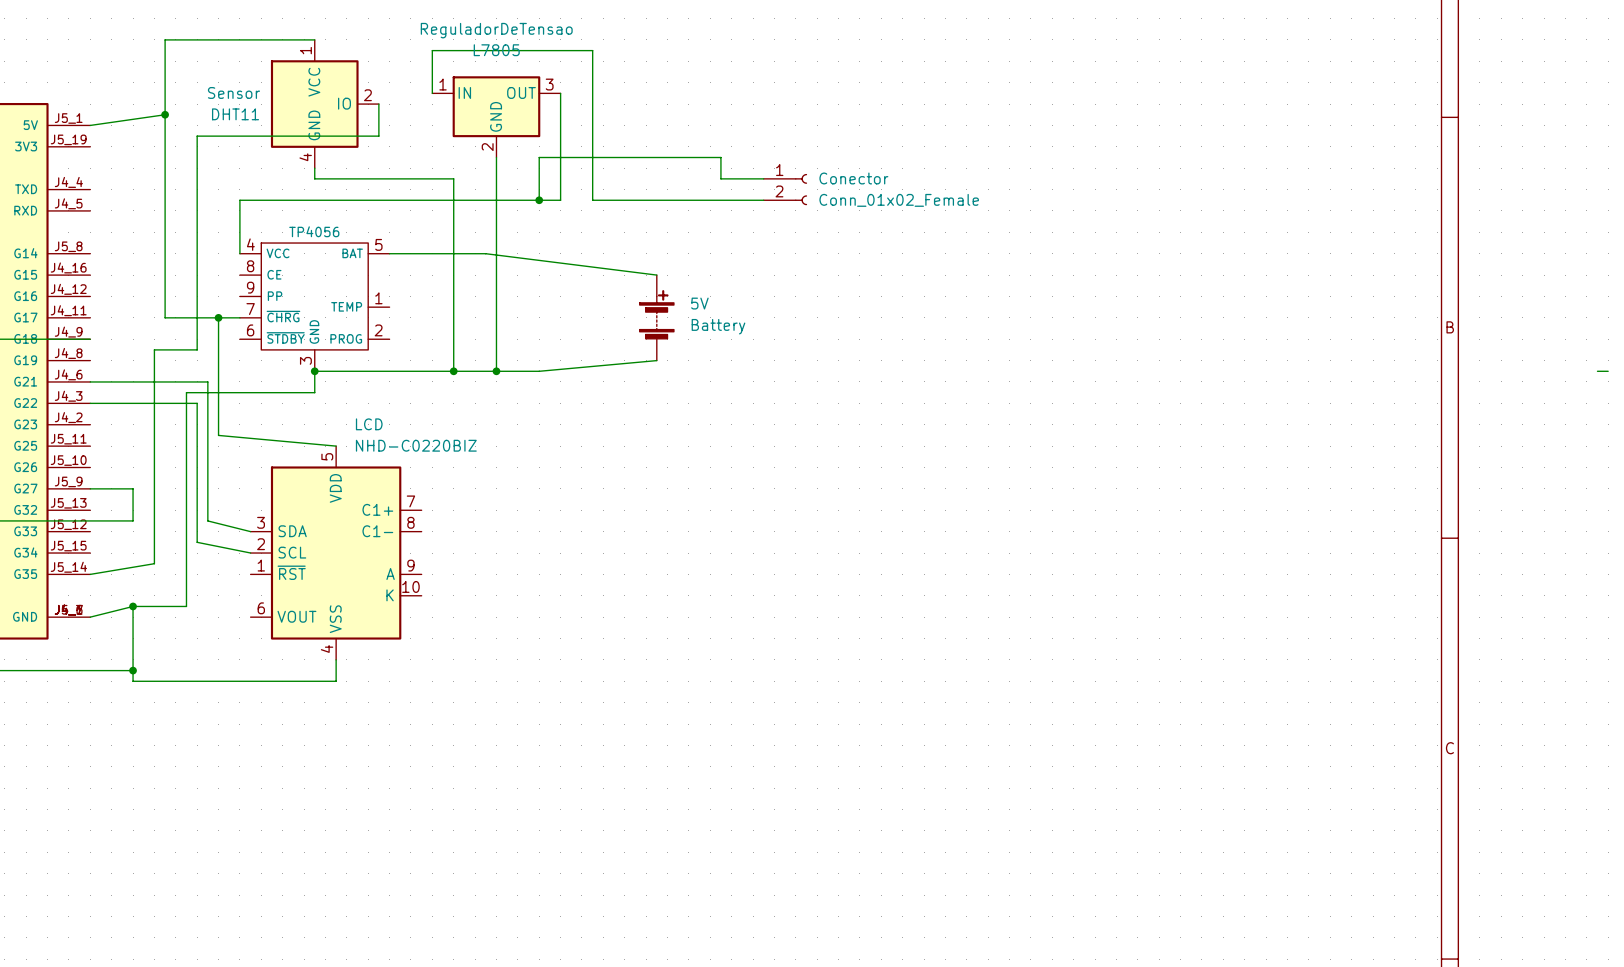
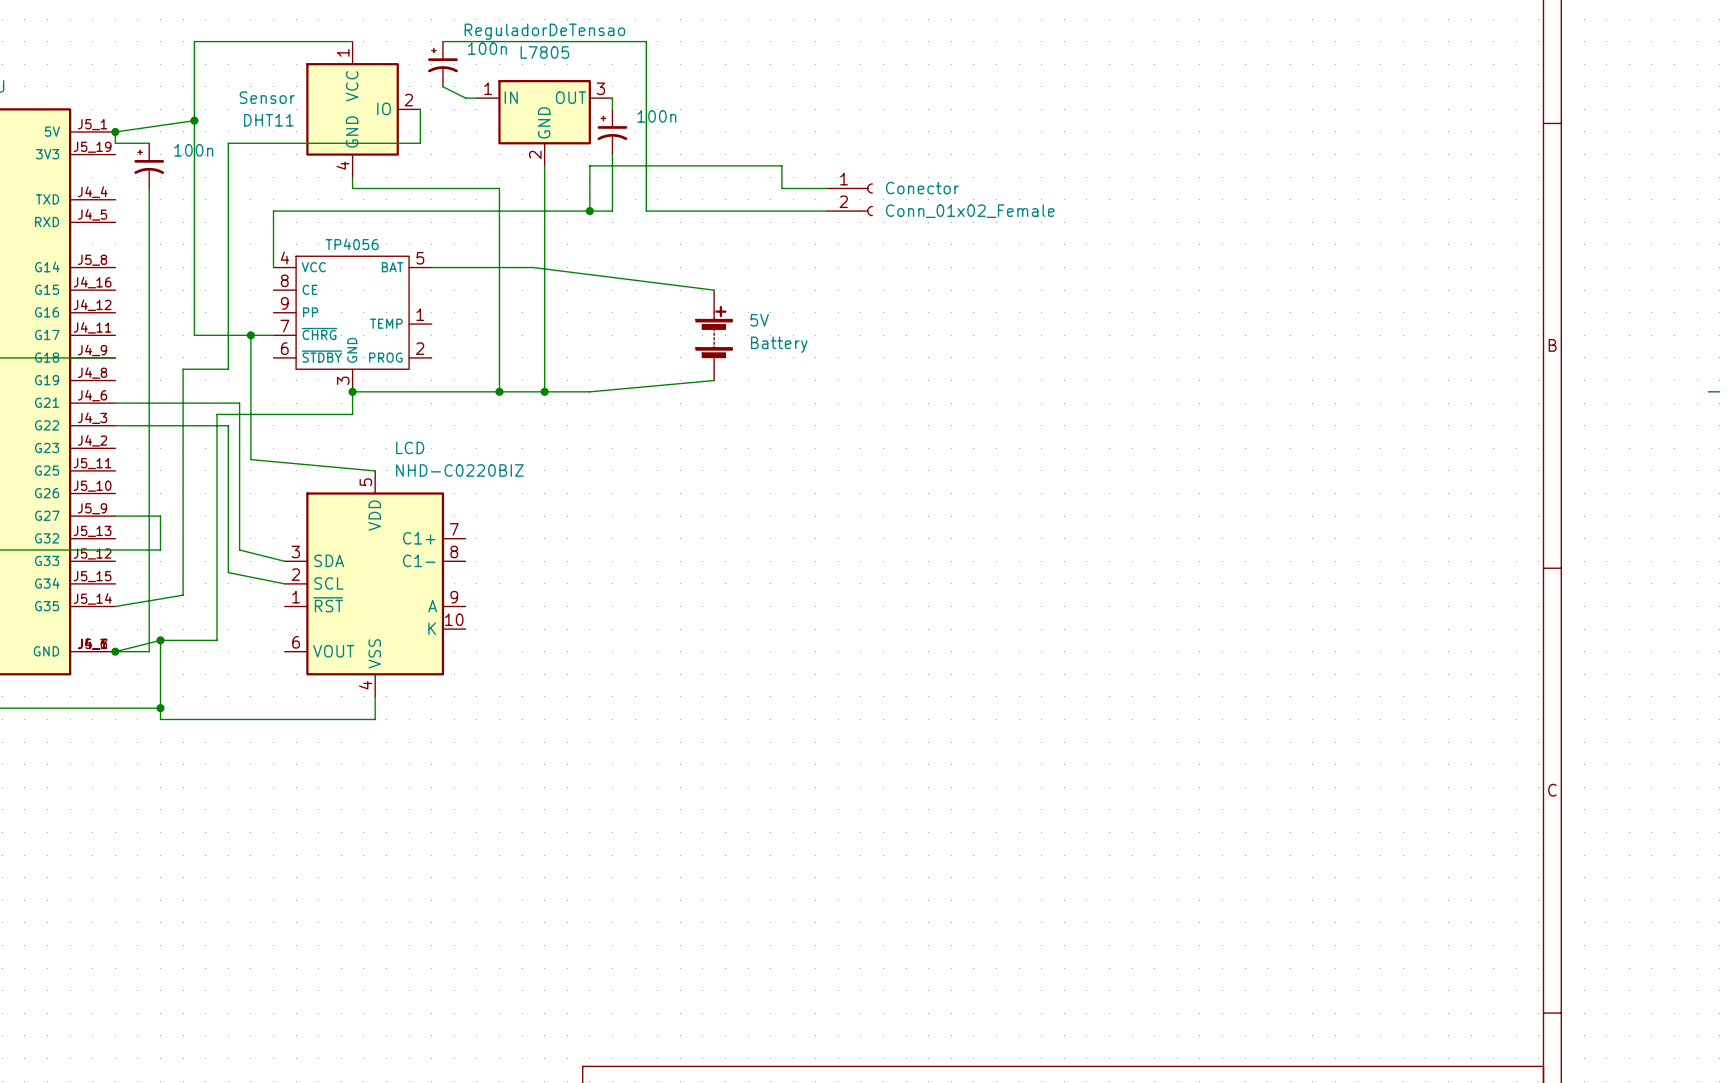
wire: (592, 50) (432, 50) (432, 93) -> (646, 52) (646, 41) (442, 41)
100n: none -> (442, 64)
wire: none -> (442, 86) (465, 98) (476, 98)
wire: none -> (115, 131) (115, 143) (149, 143)
junction: none -> (115, 131)
100n: none -> (612, 131)
100n: none -> (149, 165)
wire: none -> (149, 188) (149, 651) (115, 651)
junction: none -> (115, 651)

